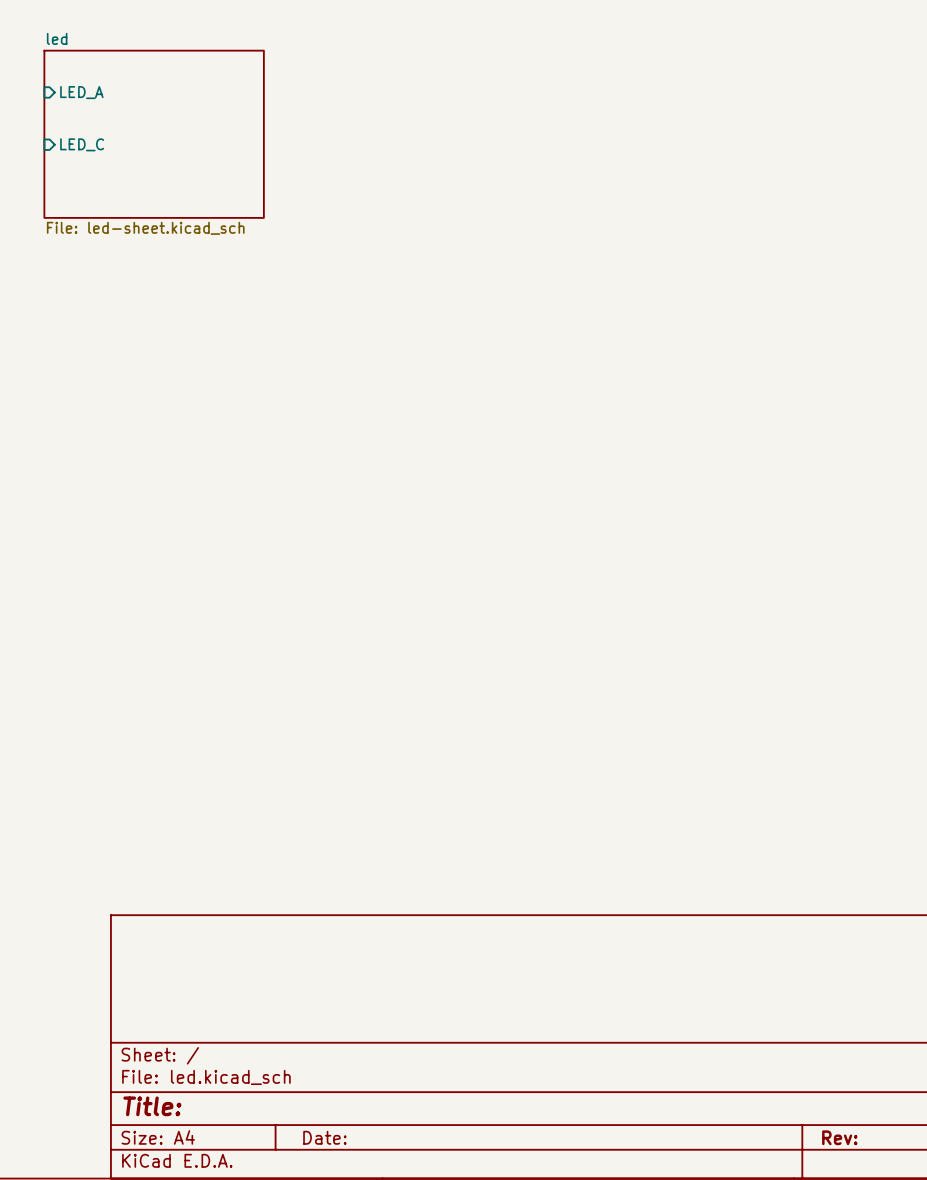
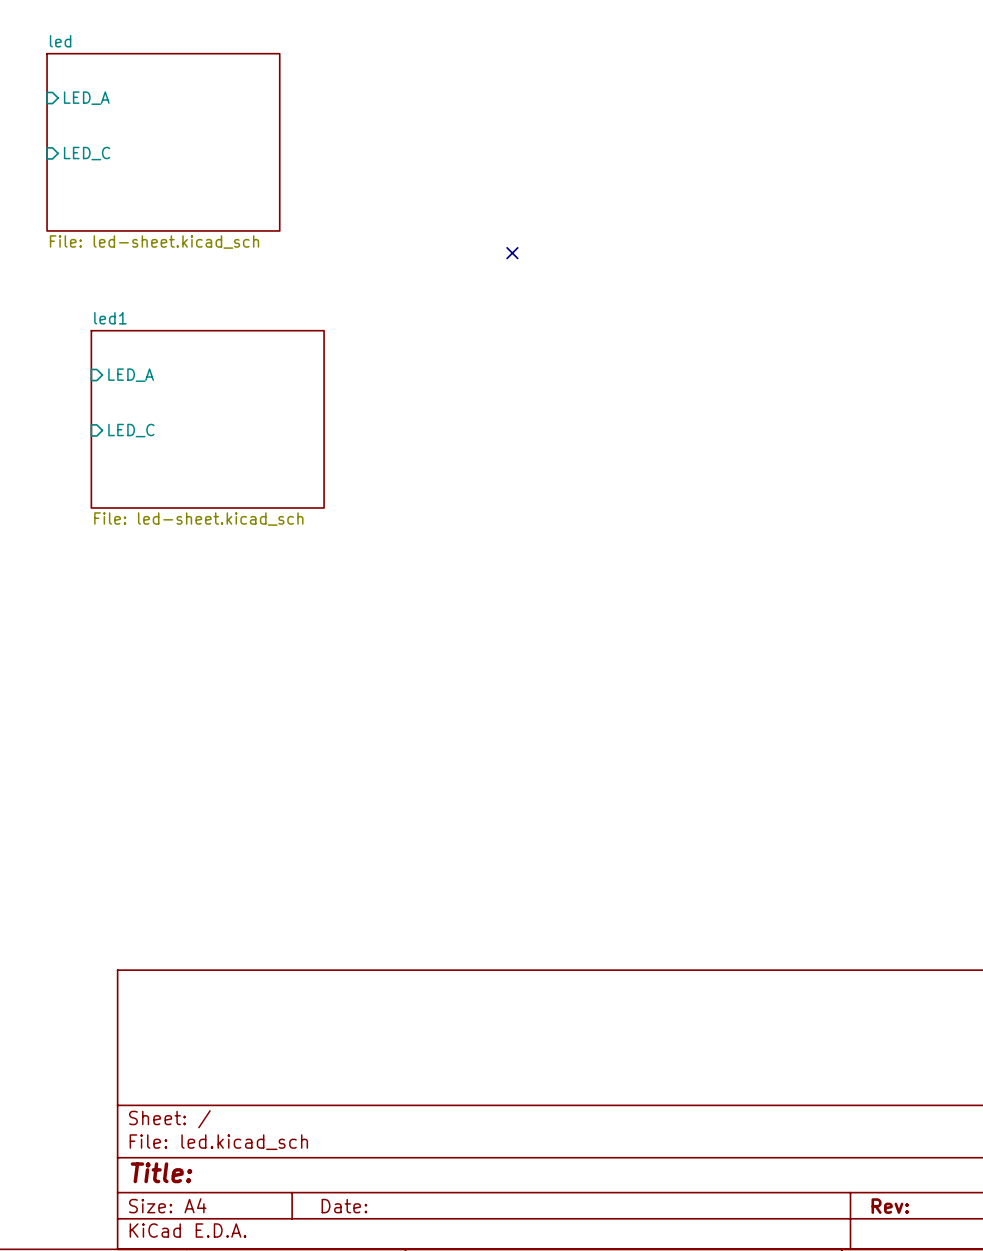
no-connect mark: none -> (512, 253)
sheet pin: none -> LED_A (131, 375)
sheet led1: none -> File: led-sheet.kicad_sch (207, 419)
sheet pin: none -> LED_C (131, 430)

